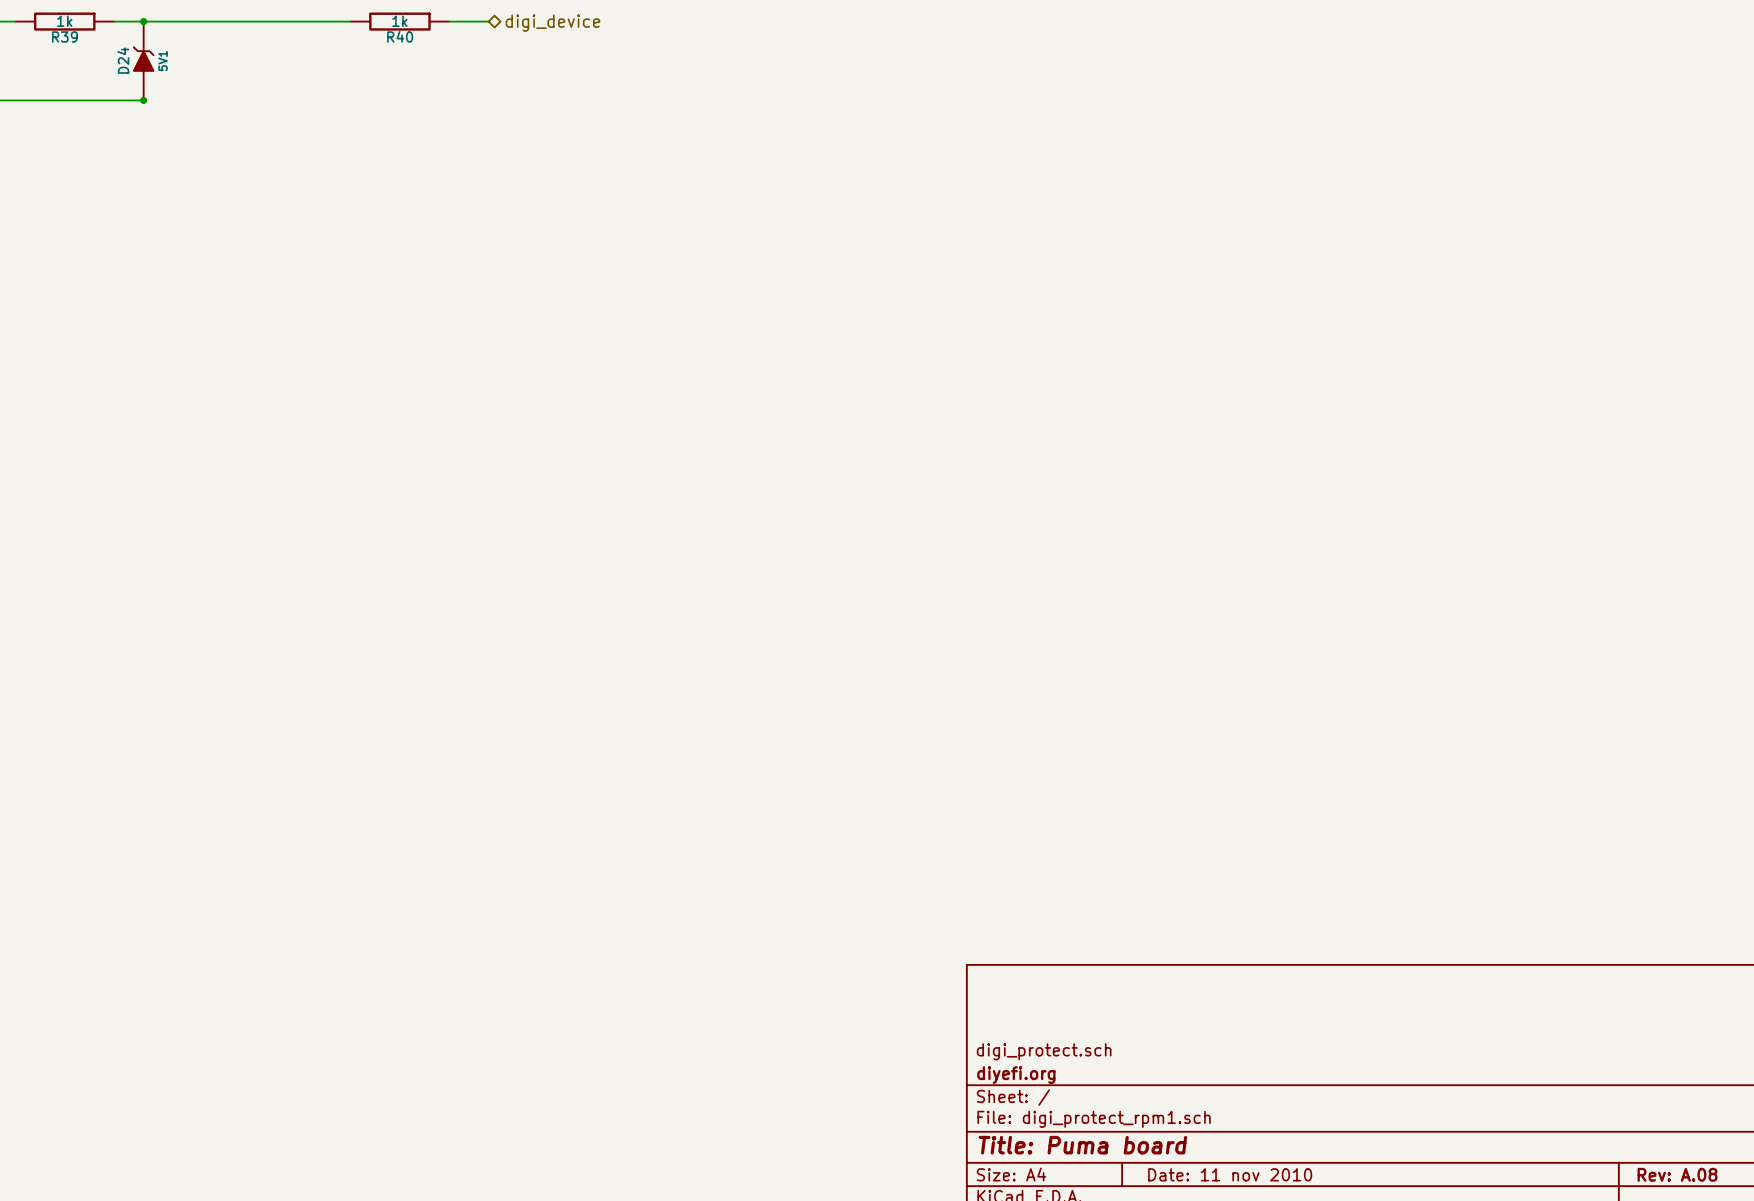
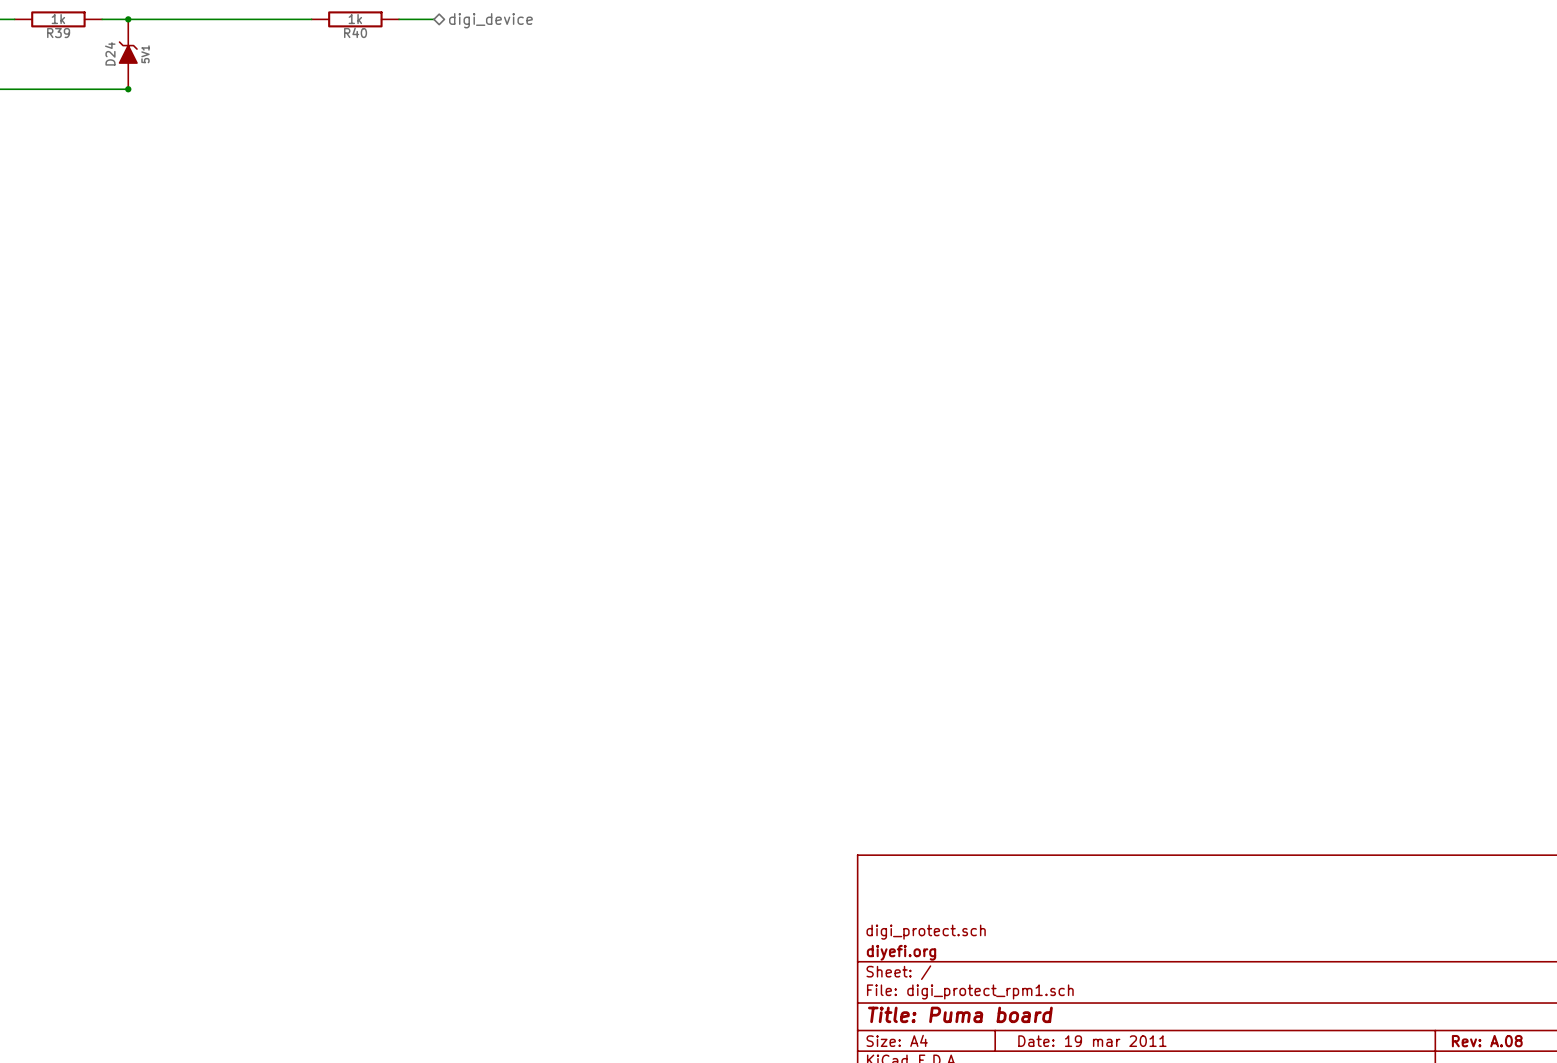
title block: Date: 11 nov 2010 (1230, 1174) -> Date: 19 mar 2011 (1092, 1041)

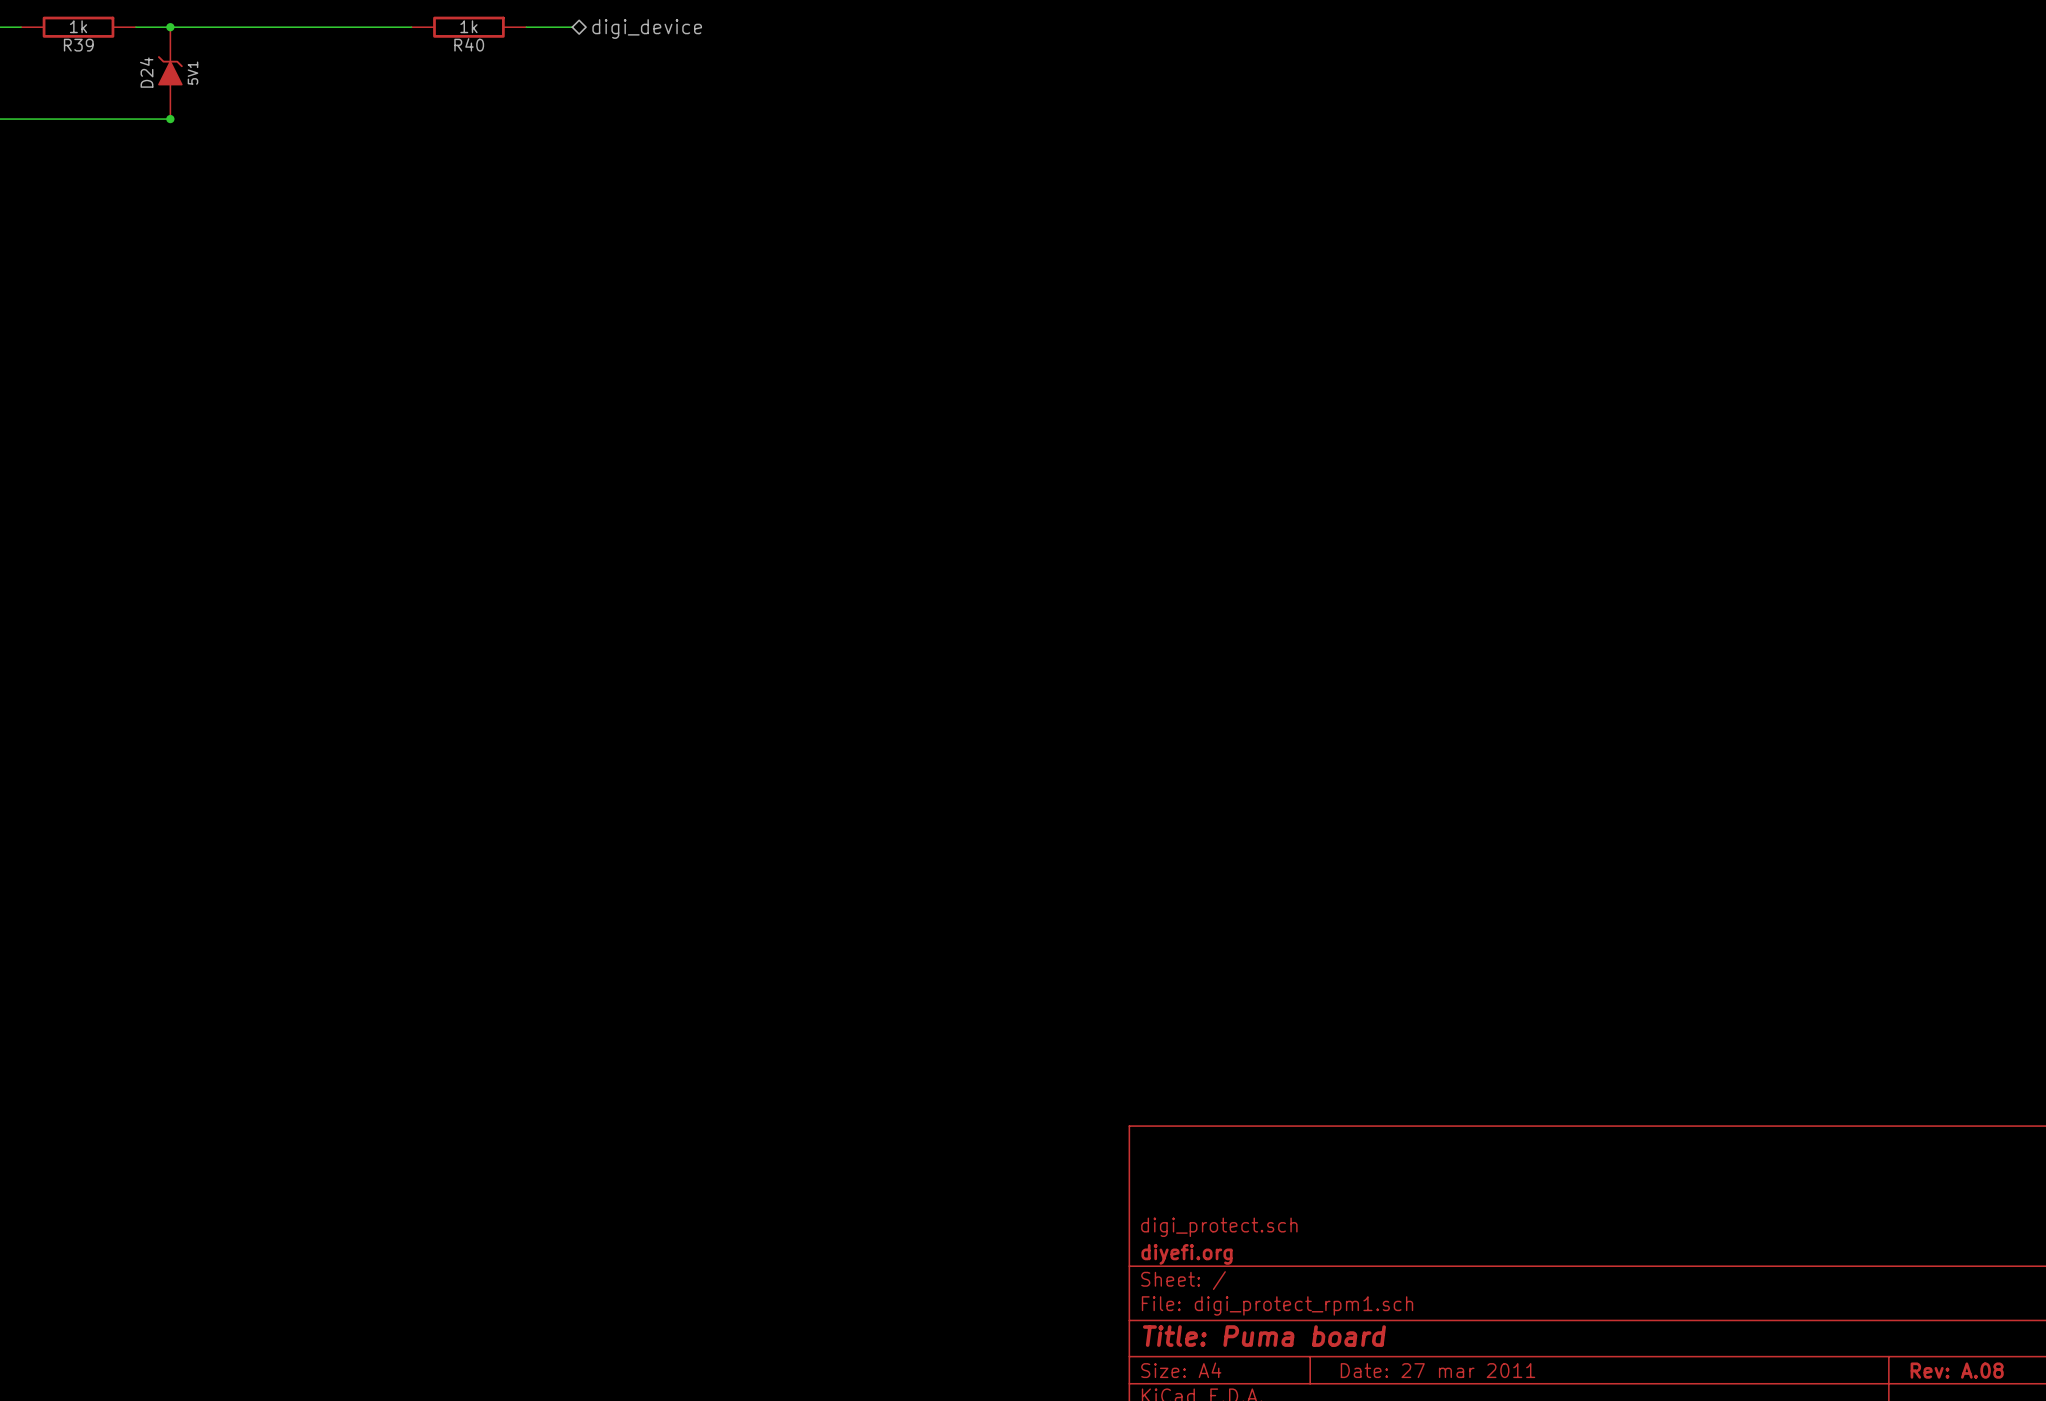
title block: Date: 19 mar 2011 (1092, 1041) -> Date: 27 mar 2011 (1438, 1370)

